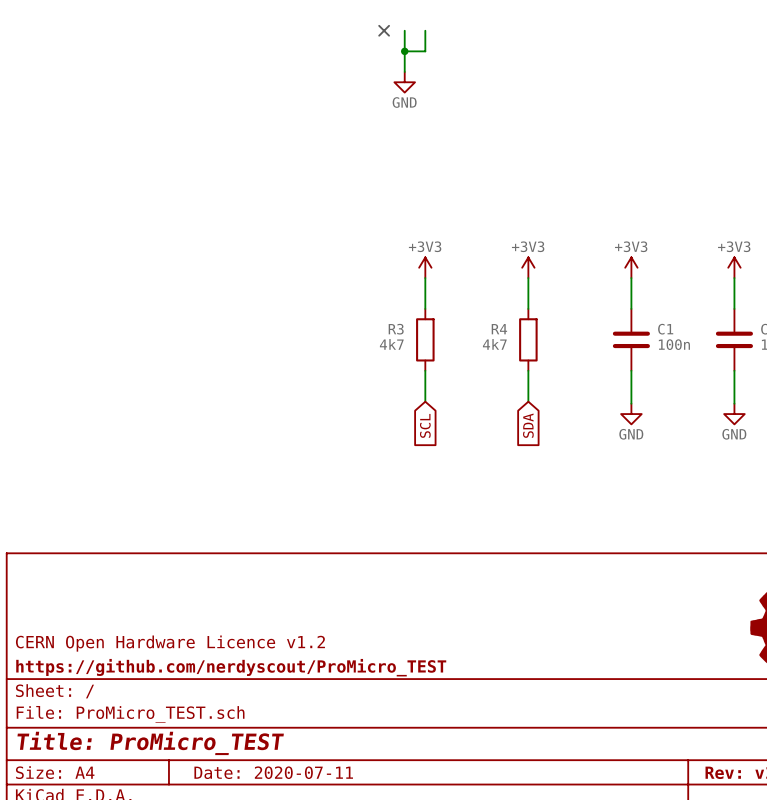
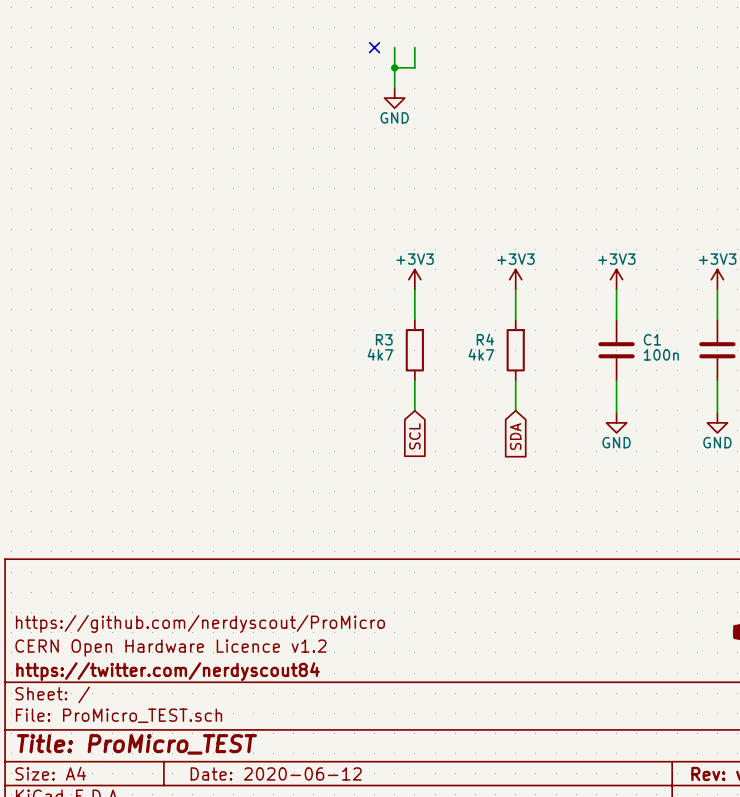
title block: none -> https://github.com/nerdyscout/ProMicro (200, 623)
title block: https://github.com/nerdyscout/ProMicro_TEST (231, 667) -> https://twitter.com/nerdyscout84 (168, 671)
title block: Date: 2020-07-11 (273, 772) -> Date: 2020-06-12 (276, 773)

